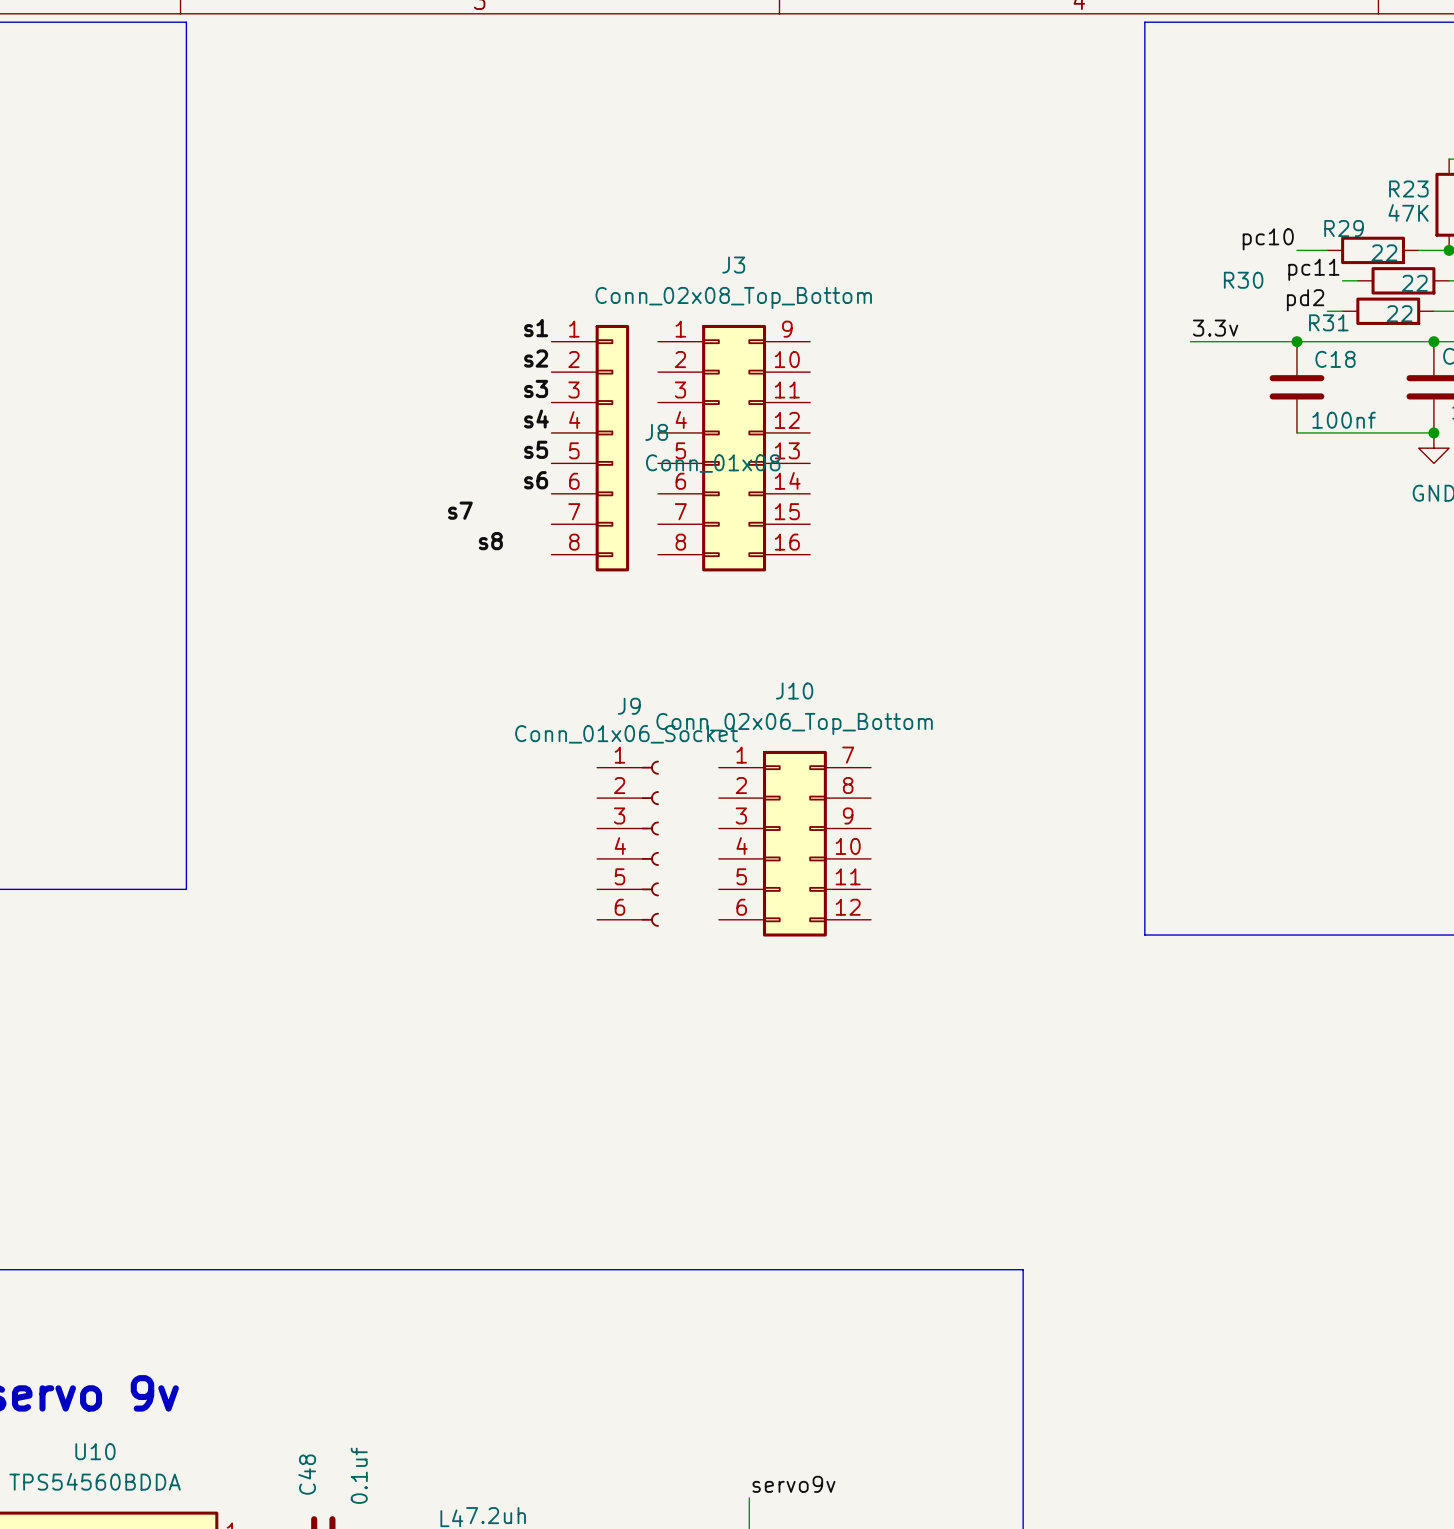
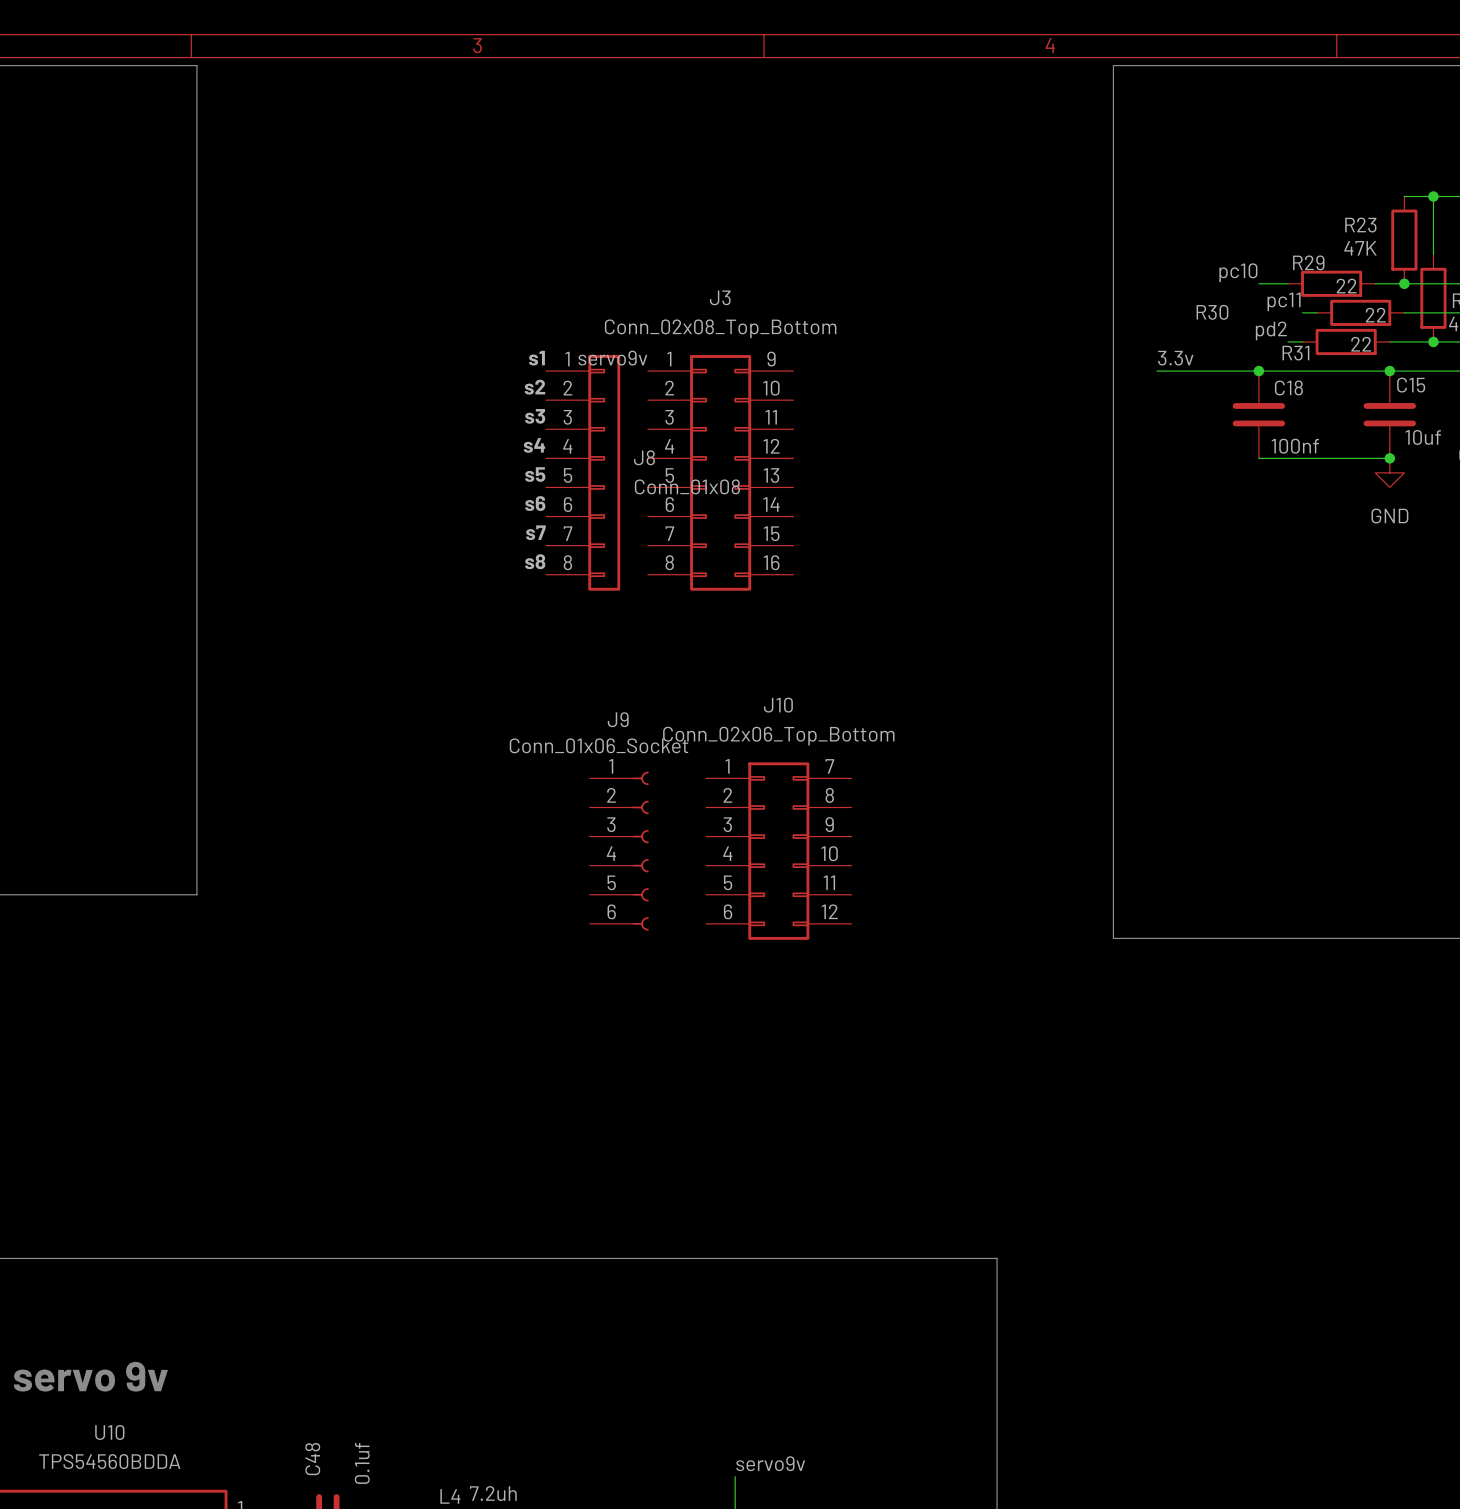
label: none -> servo9v (612, 358)
label position: s7 (460, 510) -> s7 (535, 532)
label position: s8 (490, 541) -> s8 (535, 561)

